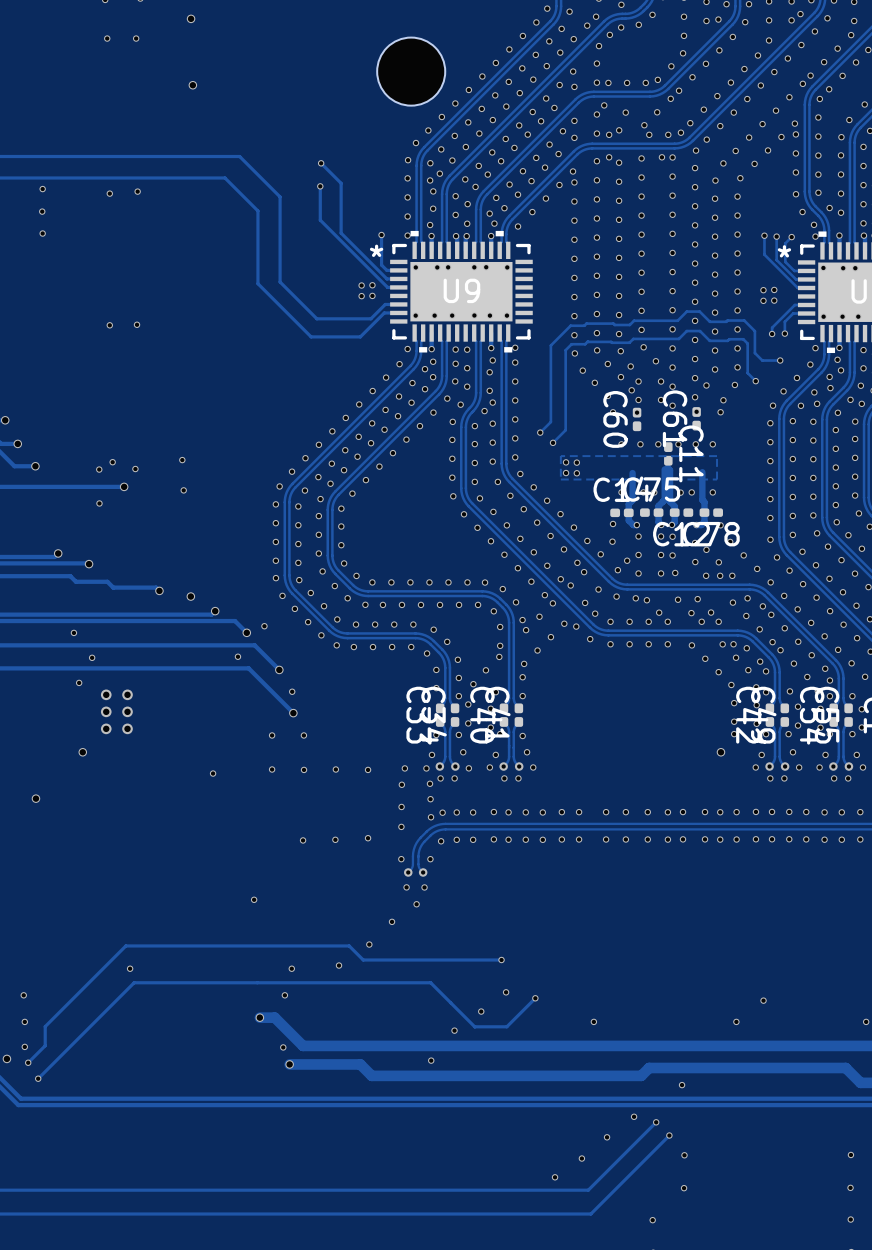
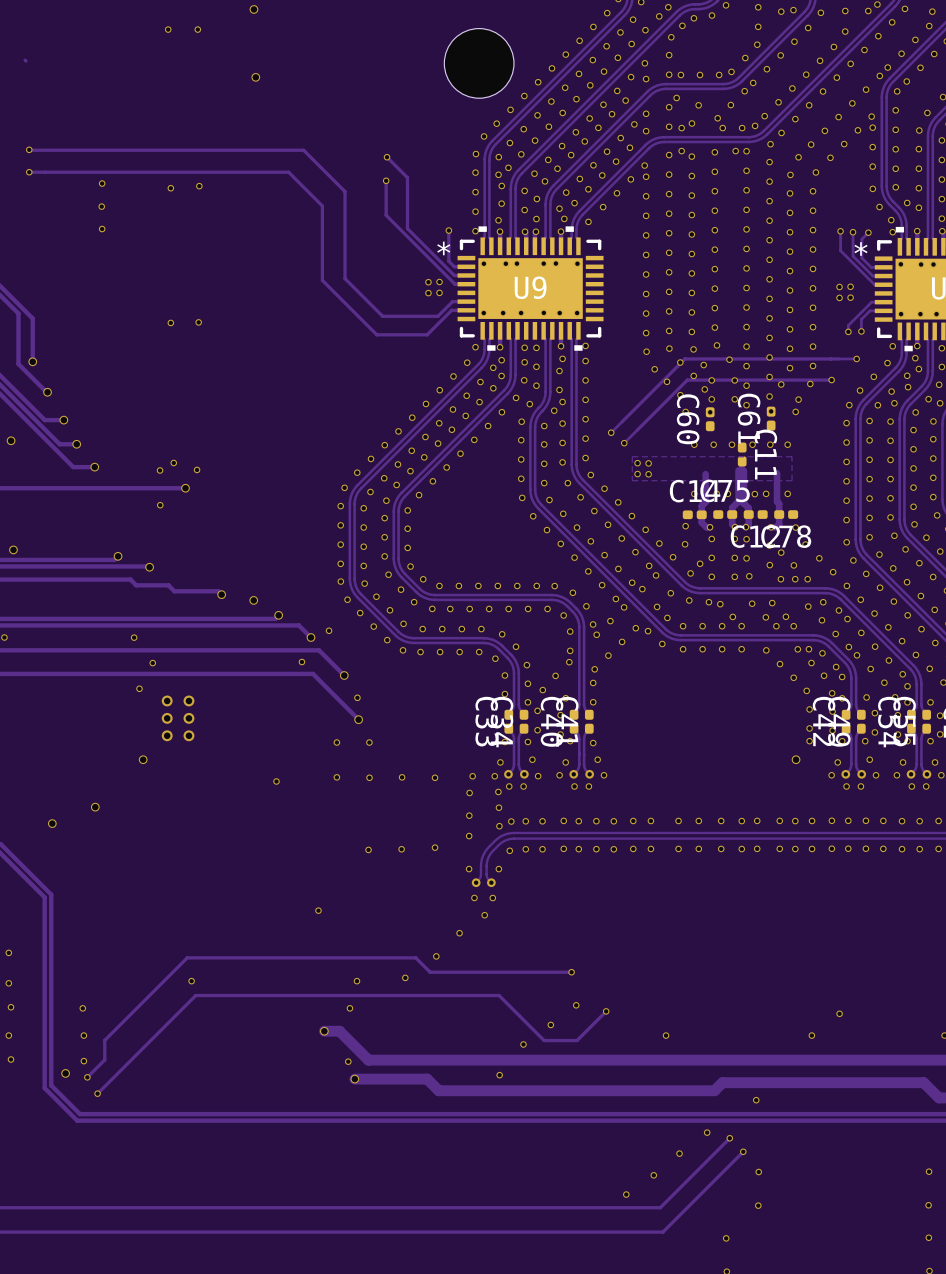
track: (762, 360) (754, 353) (754, 331) (744, 320) (709, 321) (699, 311) (686, 311) (677, 320) (634, 320) (629, 324) (586, 323) (584, 325) (570, 325) (550, 345) (550, 422) -> (838, 358) (684, 358) (622, 421)
track: (755, 381) (747, 373) (747, 343) (743, 339) (709, 340) (700, 331) (686, 331) (678, 338) (633, 338) (629, 342) (587, 341) (585, 344) (571, 344) (565, 350) (565, 430) -> (831, 380) (687, 380) (637, 430)
via: (182, 460) -> none
via: (183, 490) -> none

